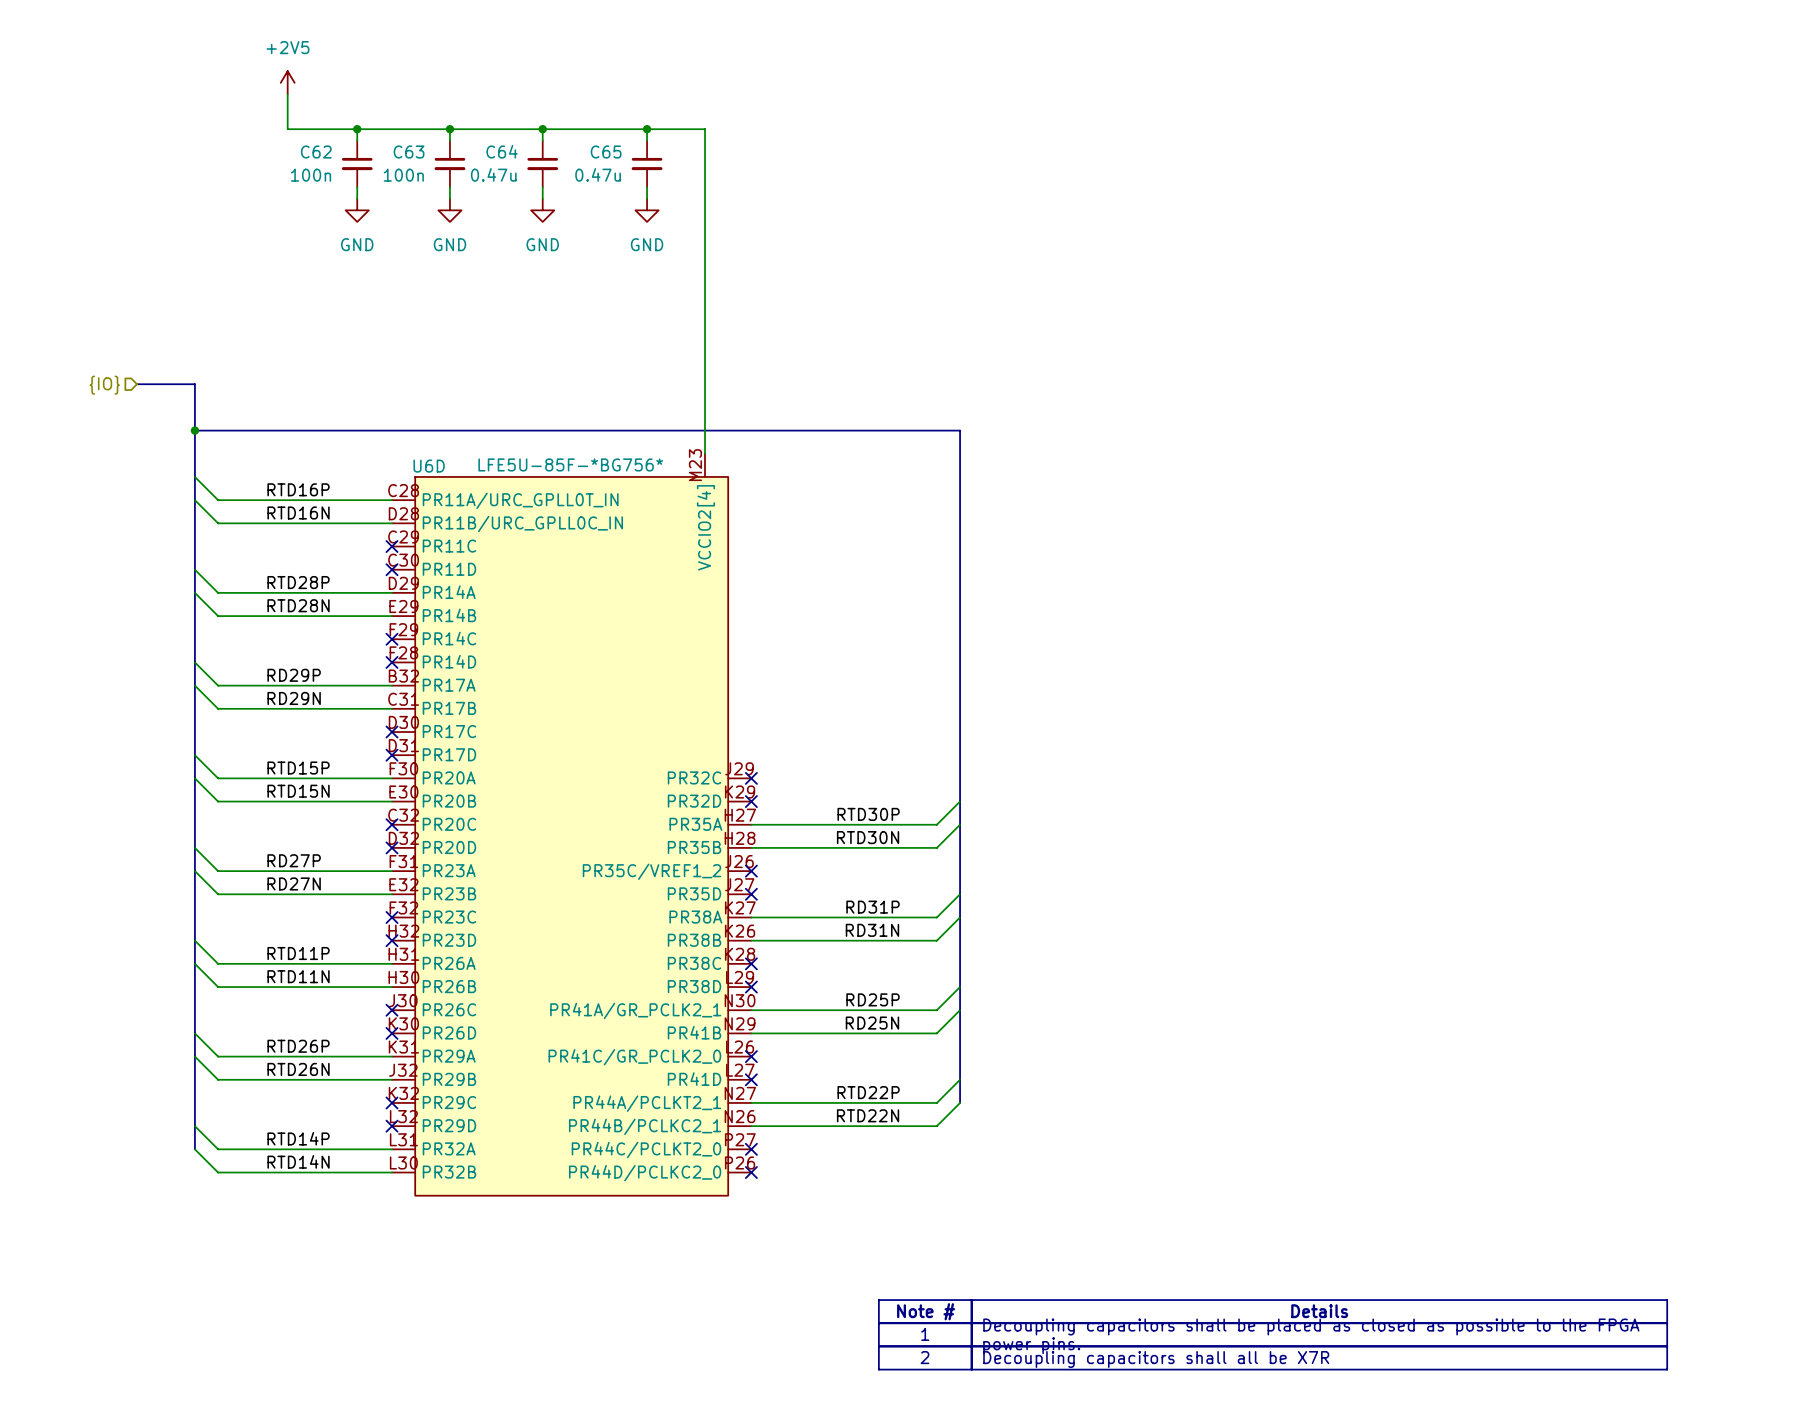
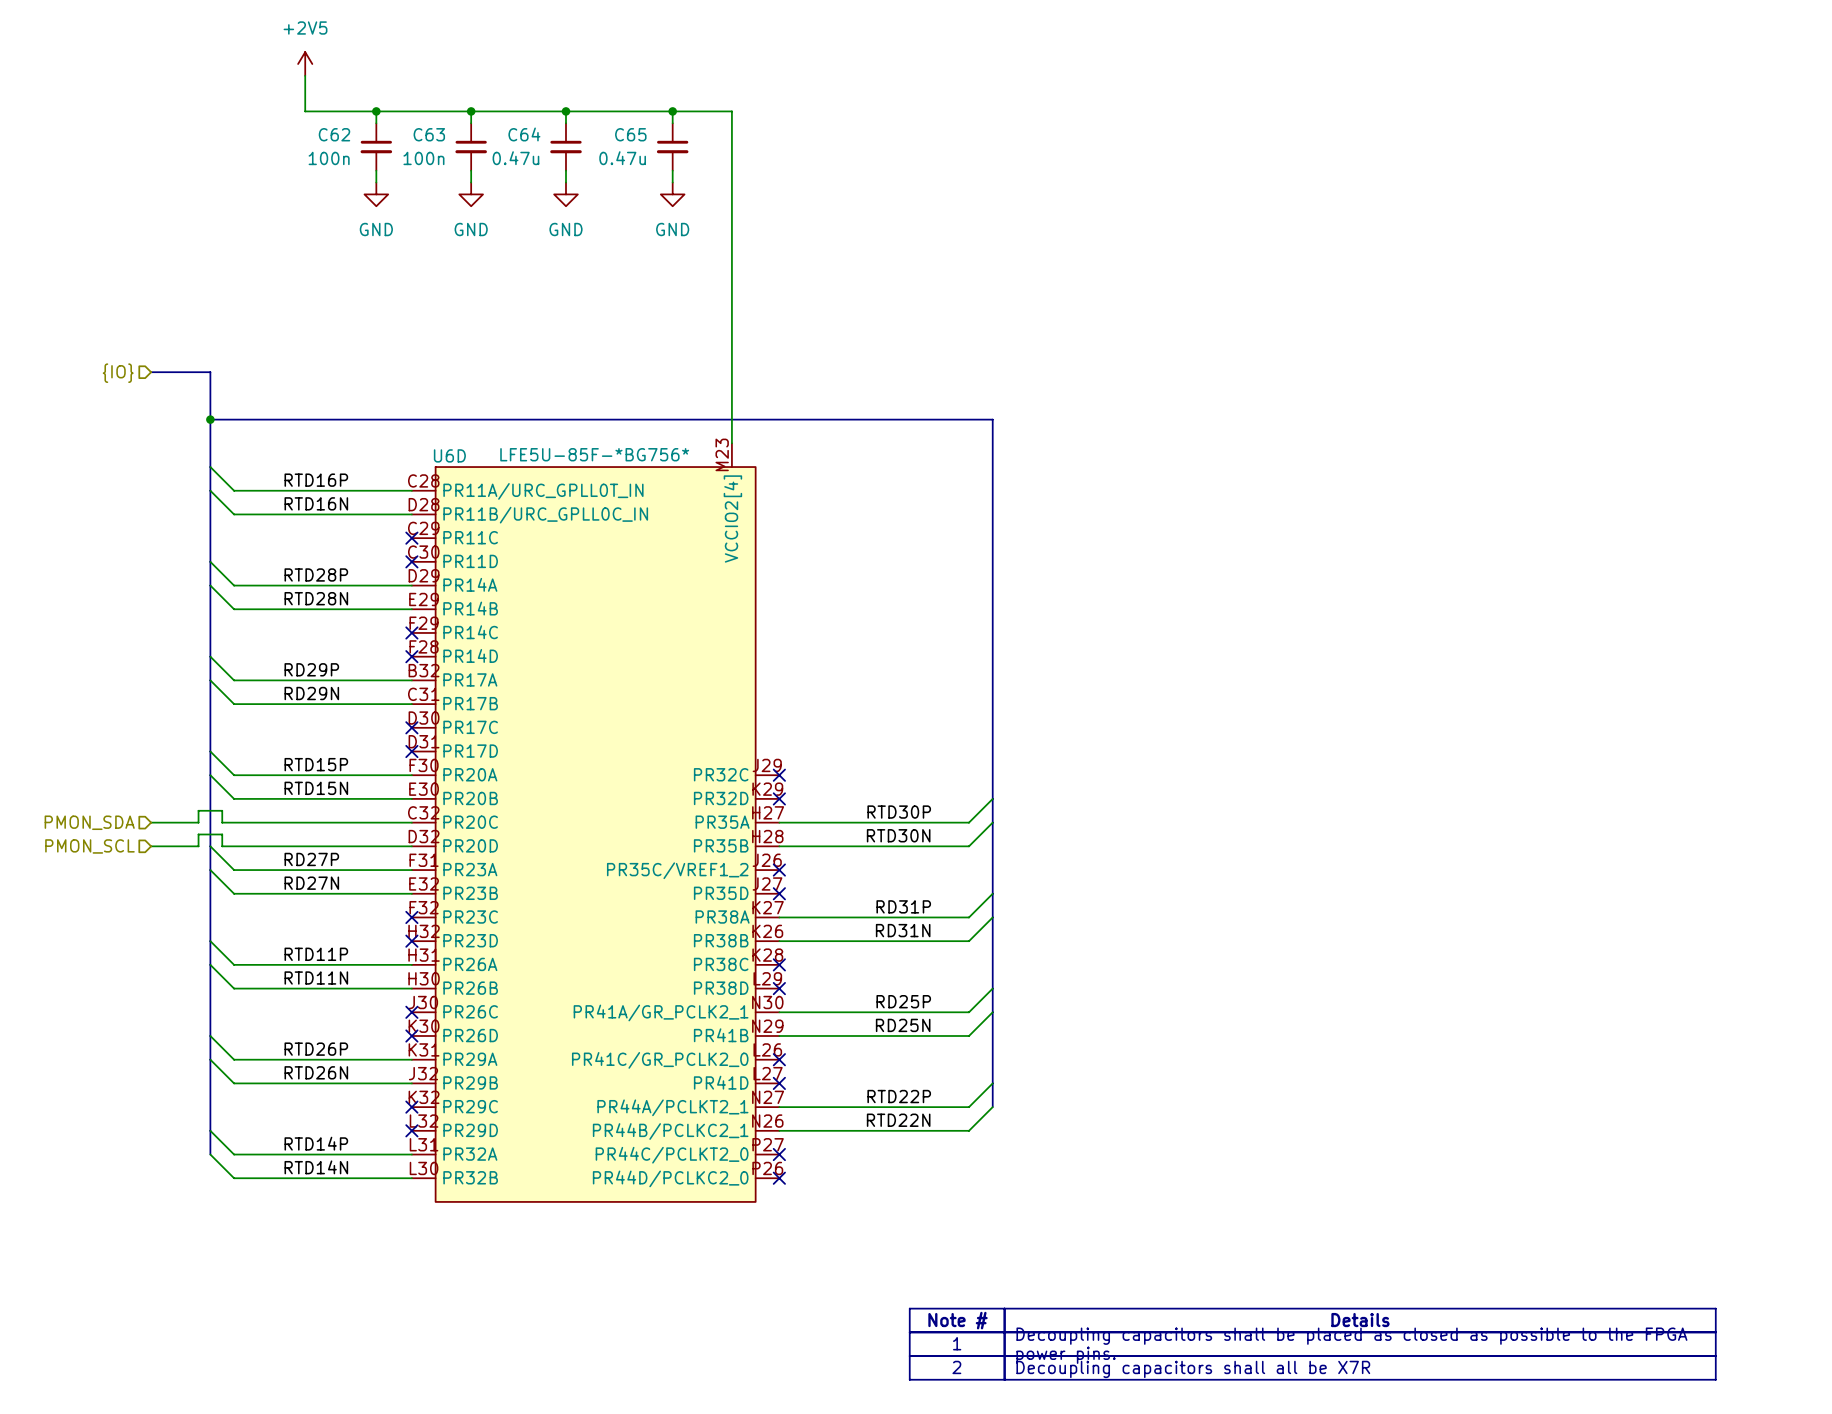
hierarchical label: none -> PMON_SDA (89, 822)
wire: none -> (151, 822) (198, 822) (198, 810) (222, 810) (222, 822) (411, 822)
no-connect mark: (392, 824) -> none
wire: none -> (151, 846) (198, 846) (198, 834) (222, 834) (222, 846) (411, 846)
no-connect mark: (392, 847) -> none
hierarchical label: none -> PMON_SCL (89, 846)

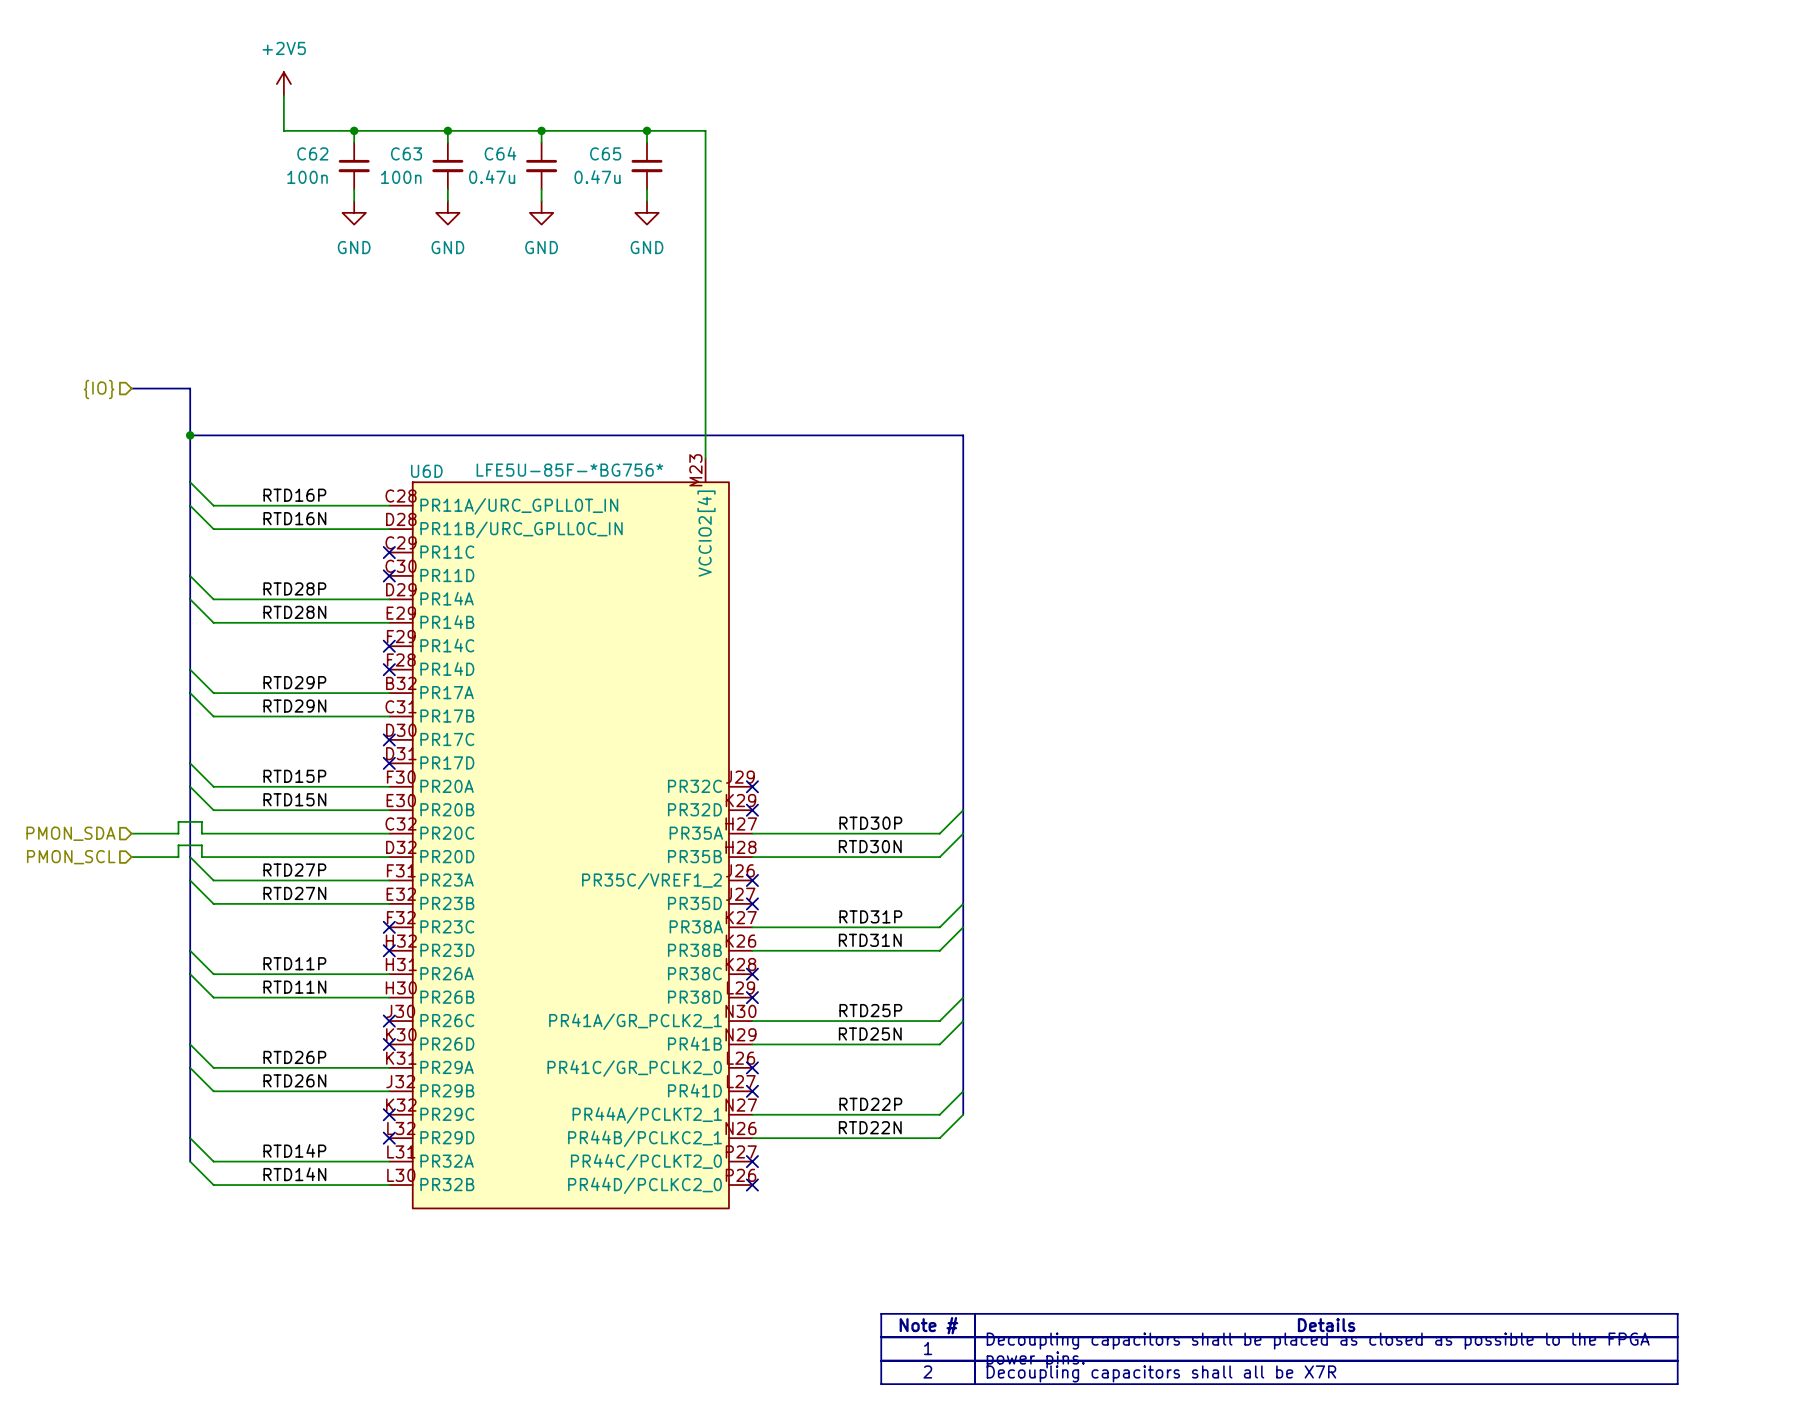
label: RD29P (311, 669) -> RTD29P (294, 682)
label: RD29N (311, 693) -> RTD29N (294, 706)
label: RD27P (311, 859) -> RTD27P (294, 870)
label: RD27N (311, 883) -> RTD27N (294, 893)
label: RD31P (903, 906) -> RTD31P (870, 916)
label: RD31N (903, 930) -> RTD31N (870, 940)
label: RD25P (903, 1001) -> RTD25P (870, 1010)
label: RD25N (903, 1025) -> RTD25N (870, 1034)

